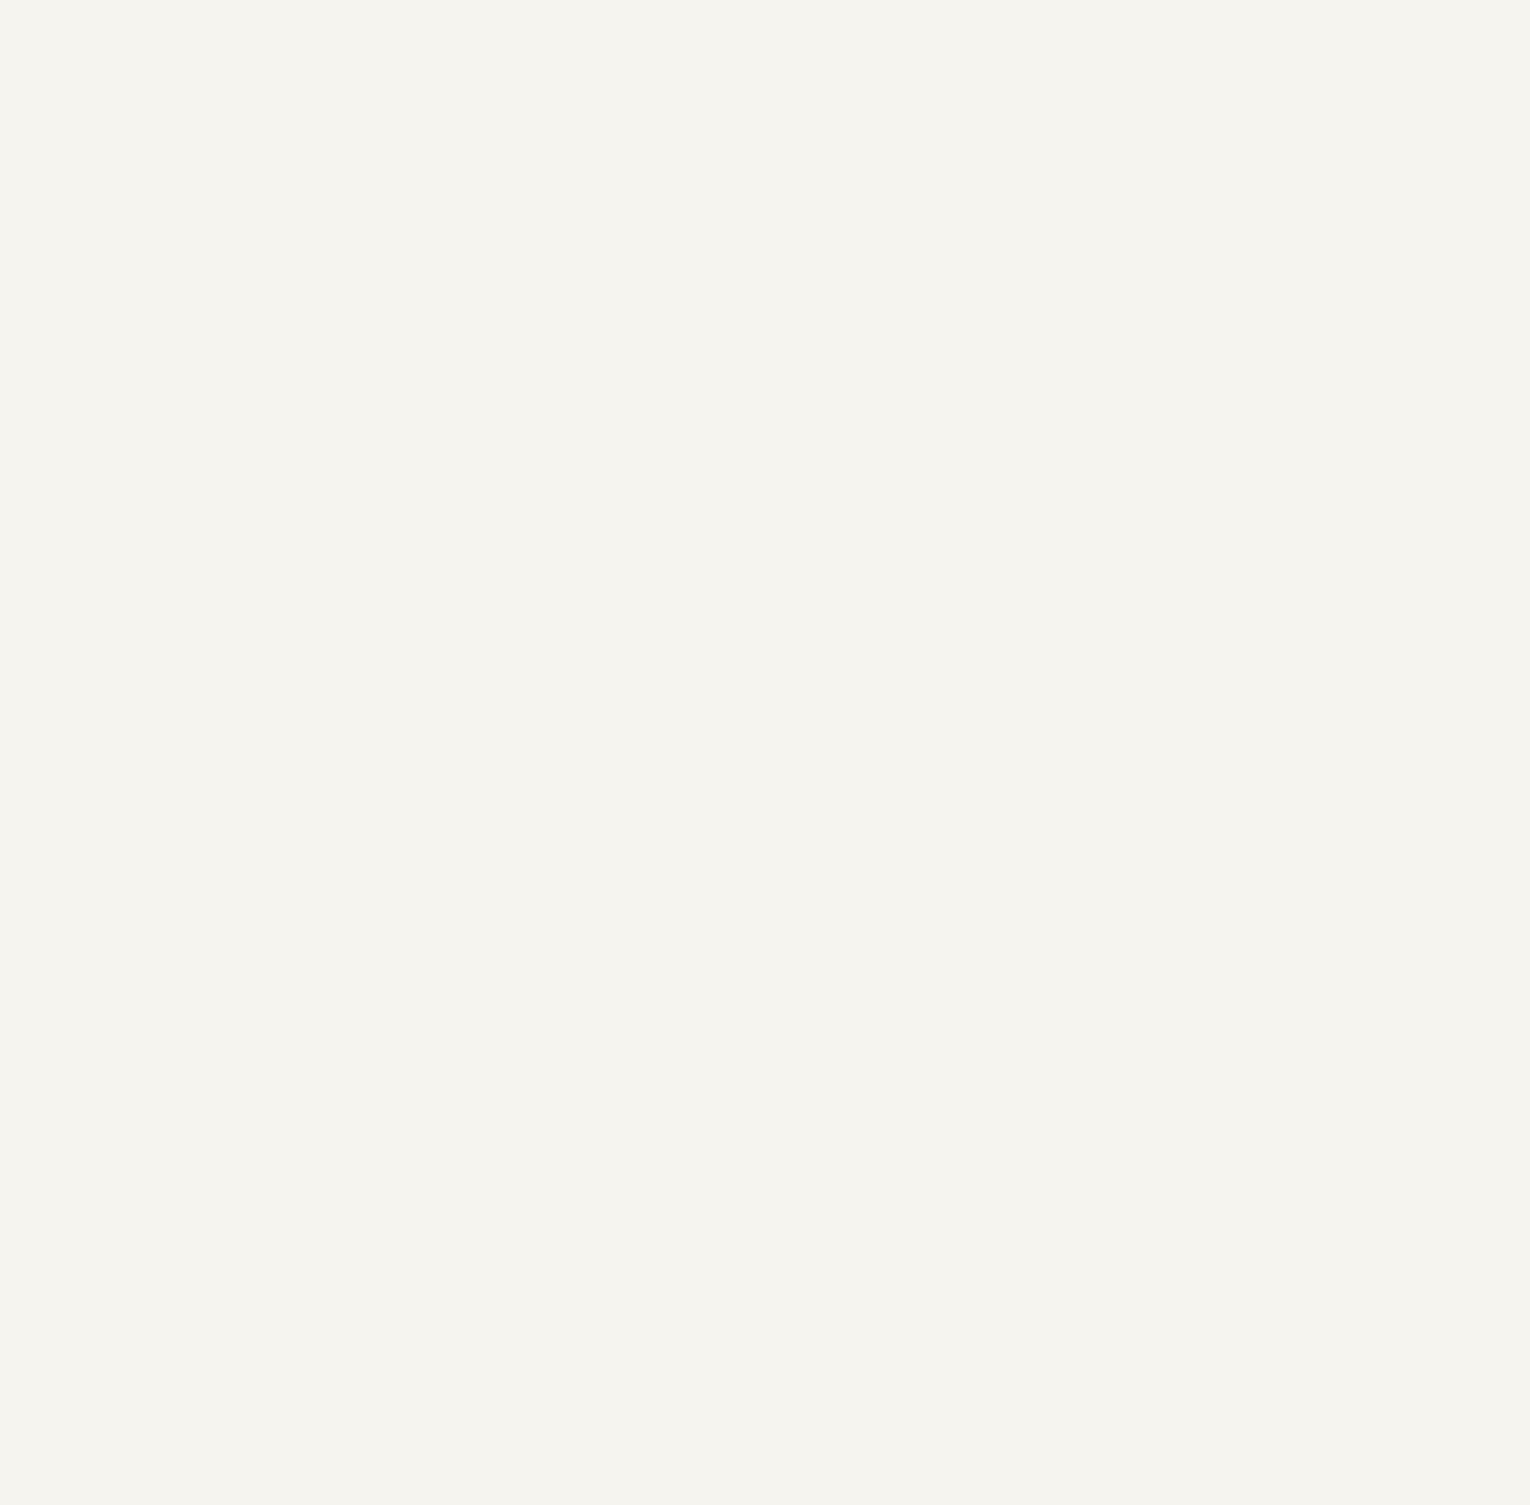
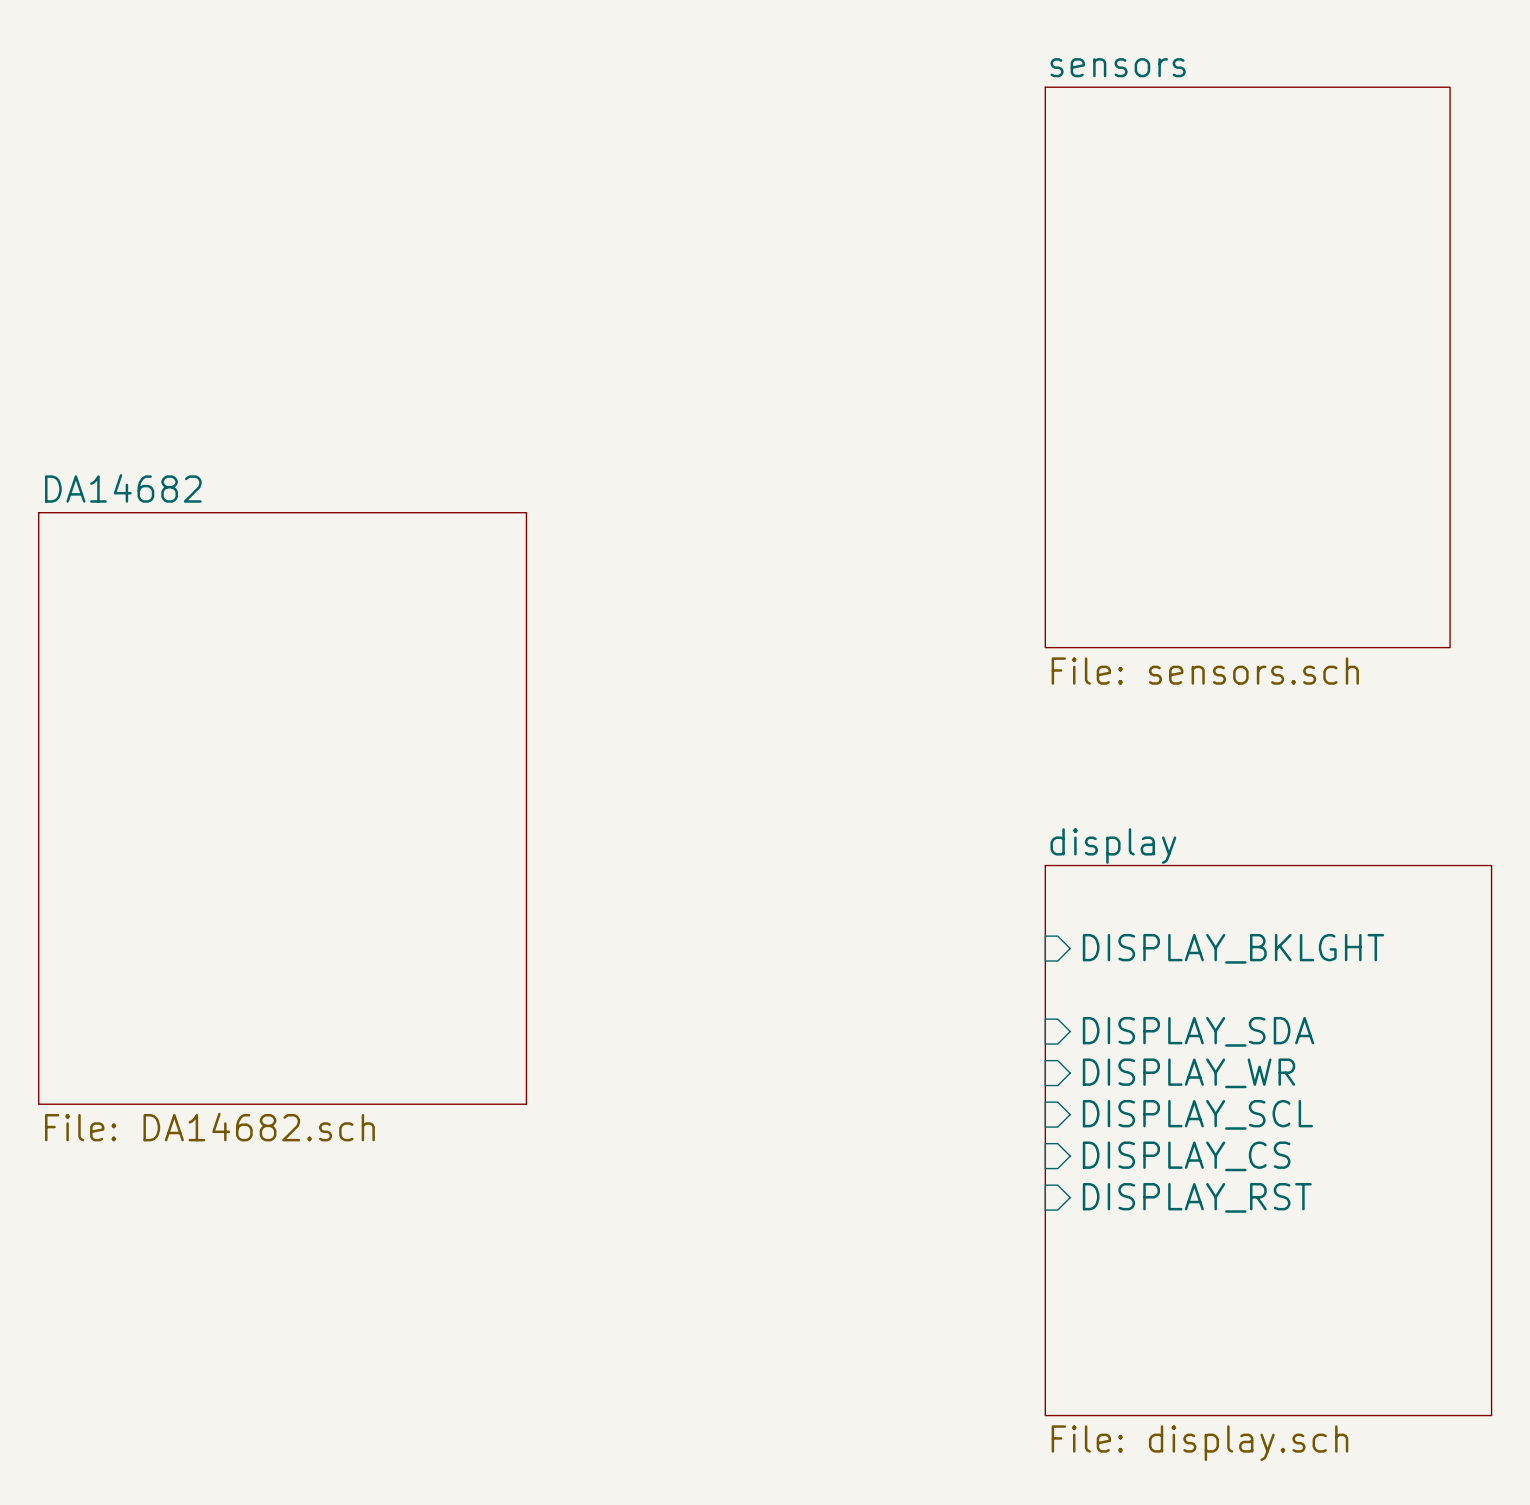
sheet sensors: none -> File: sensors.sch (1247, 367)
sheet DA14682: none -> File: DA14682.sch (282, 808)
sheet pin: none -> DISPLAY_BKLGHT (1233, 948)
sheet pin: none -> DISPLAY_SDA (1198, 1031)
sheet pin: none -> DISPLAY_WR (1188, 1073)
sheet pin: none -> DISPLAY_SCL (1197, 1114)
sheet display: none -> File: display.sch (1268, 1140)
sheet pin: none -> DISPLAY_CS (1186, 1156)
sheet pin: none -> DISPLAY_RST (1197, 1197)

